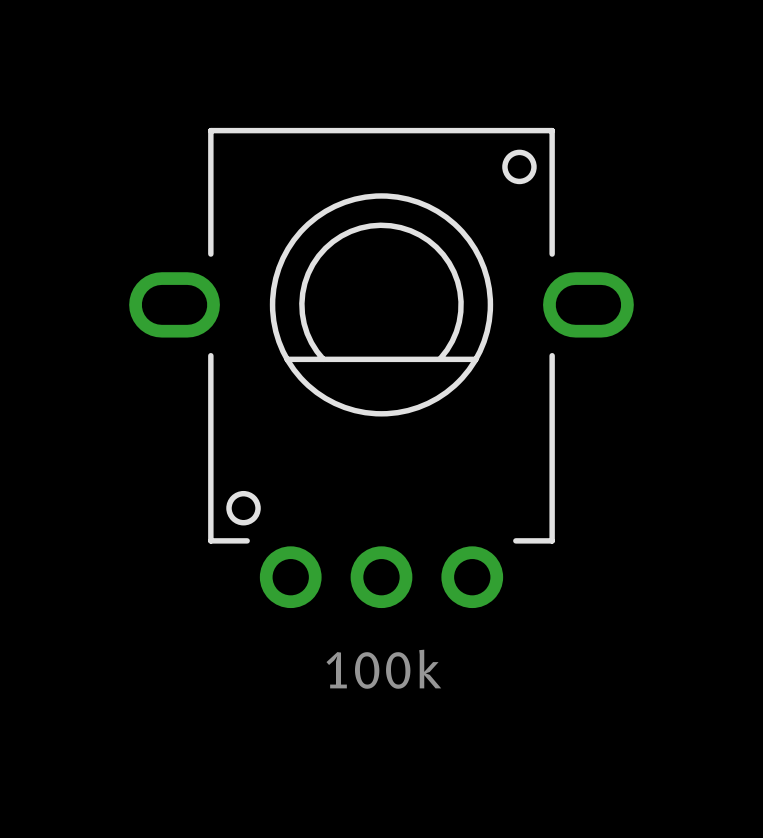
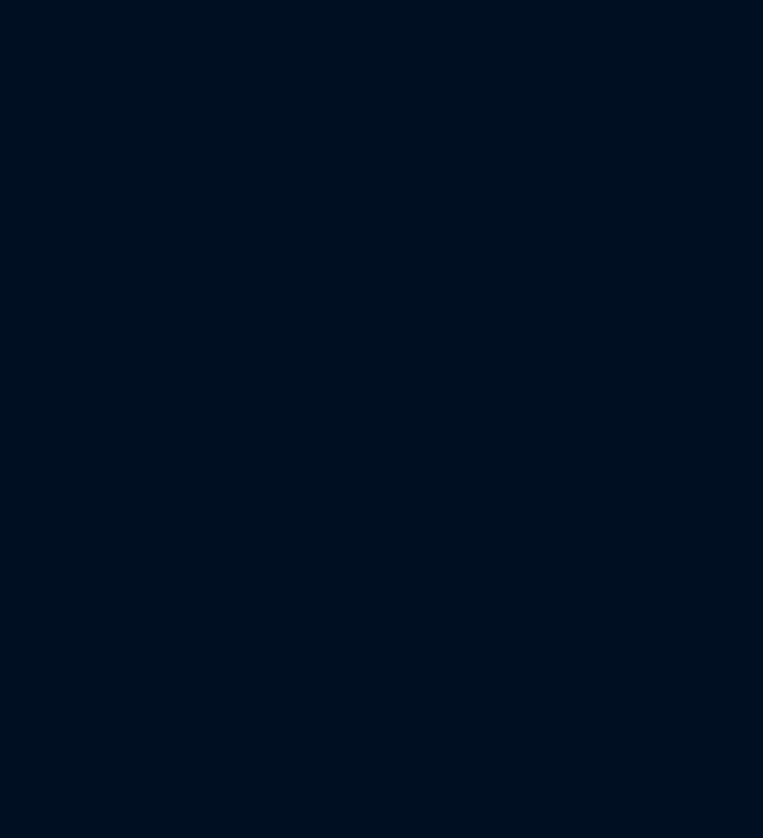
part: 100k (381, 367) -> none

